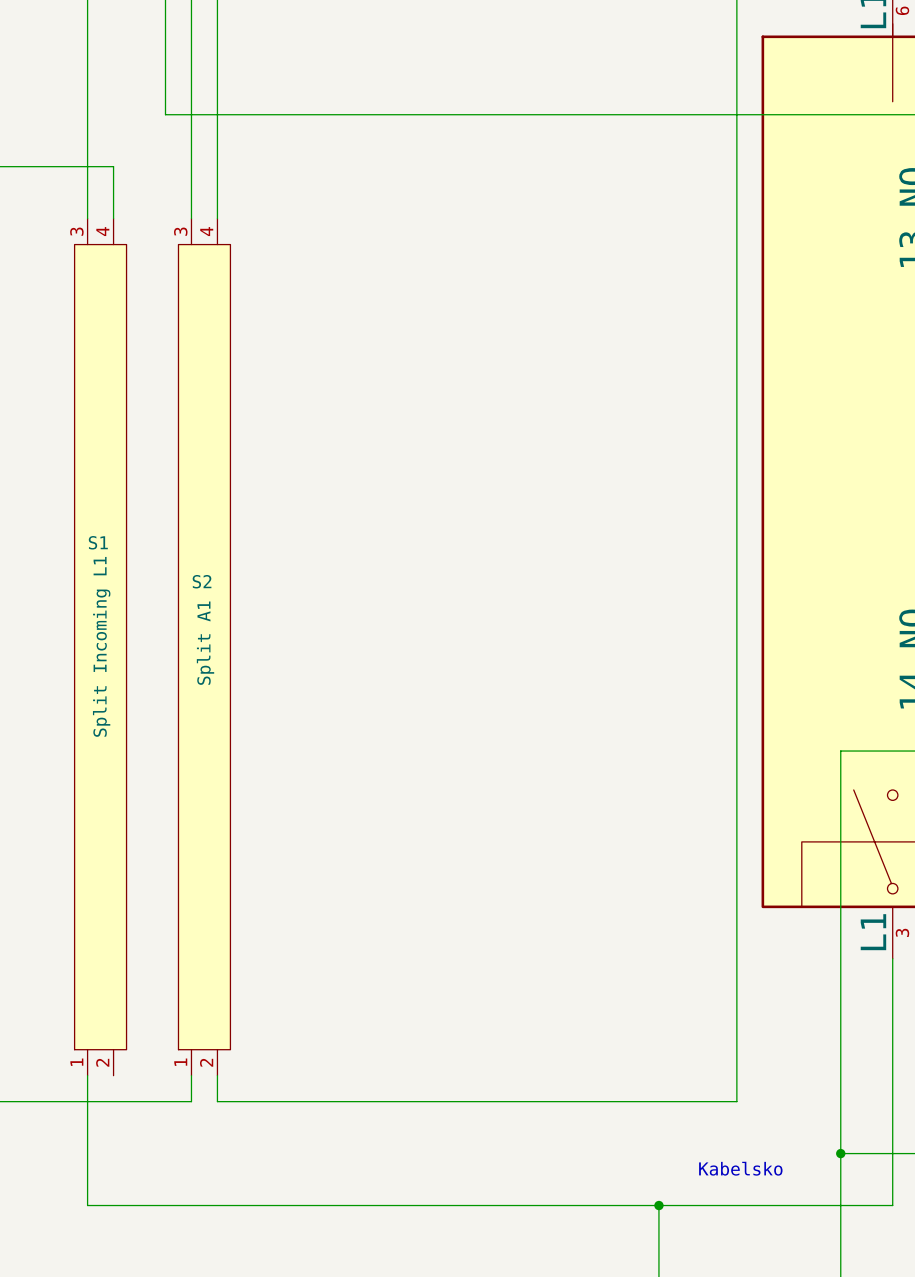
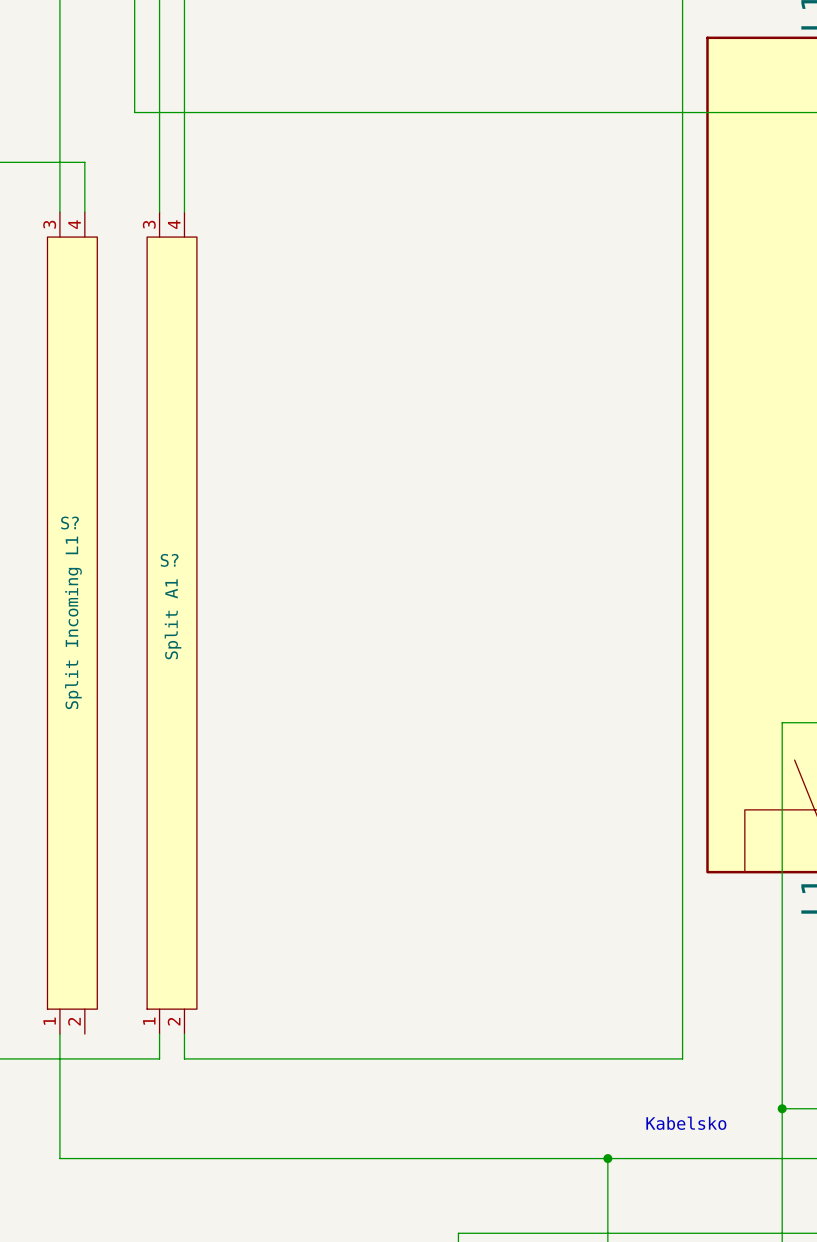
S1 name: S1 (98, 542) -> S? (69, 523)
S2 name: S2 (202, 581) -> S? (169, 560)

